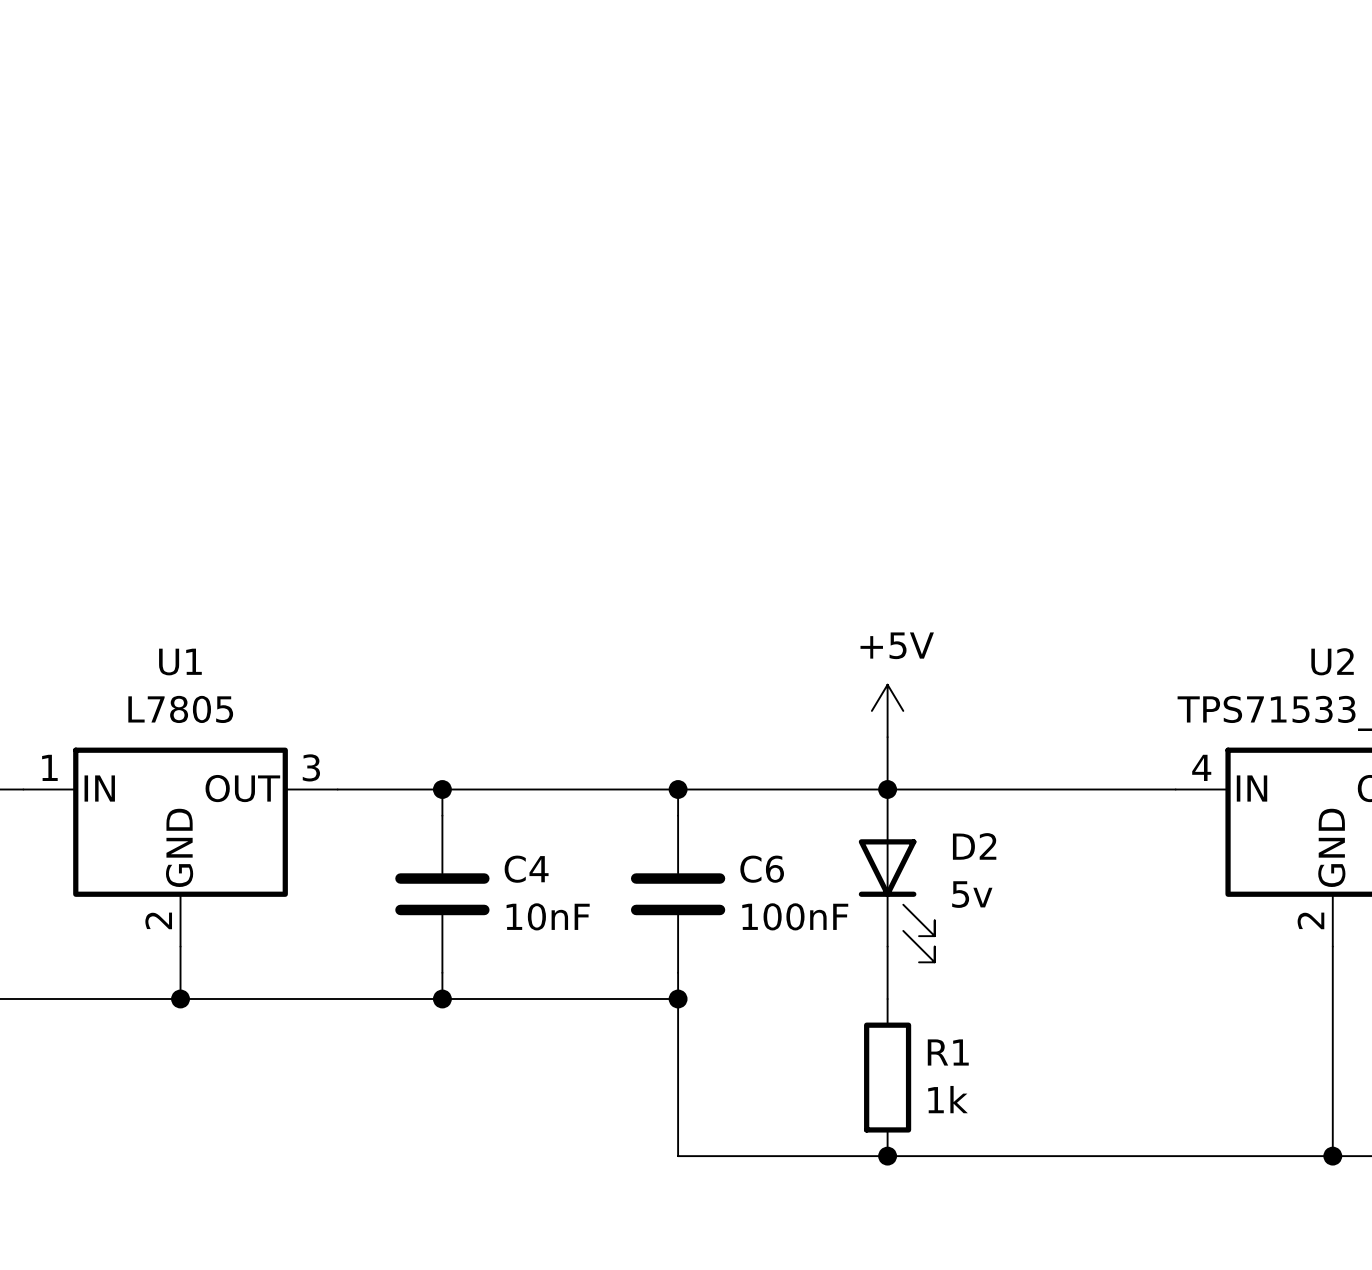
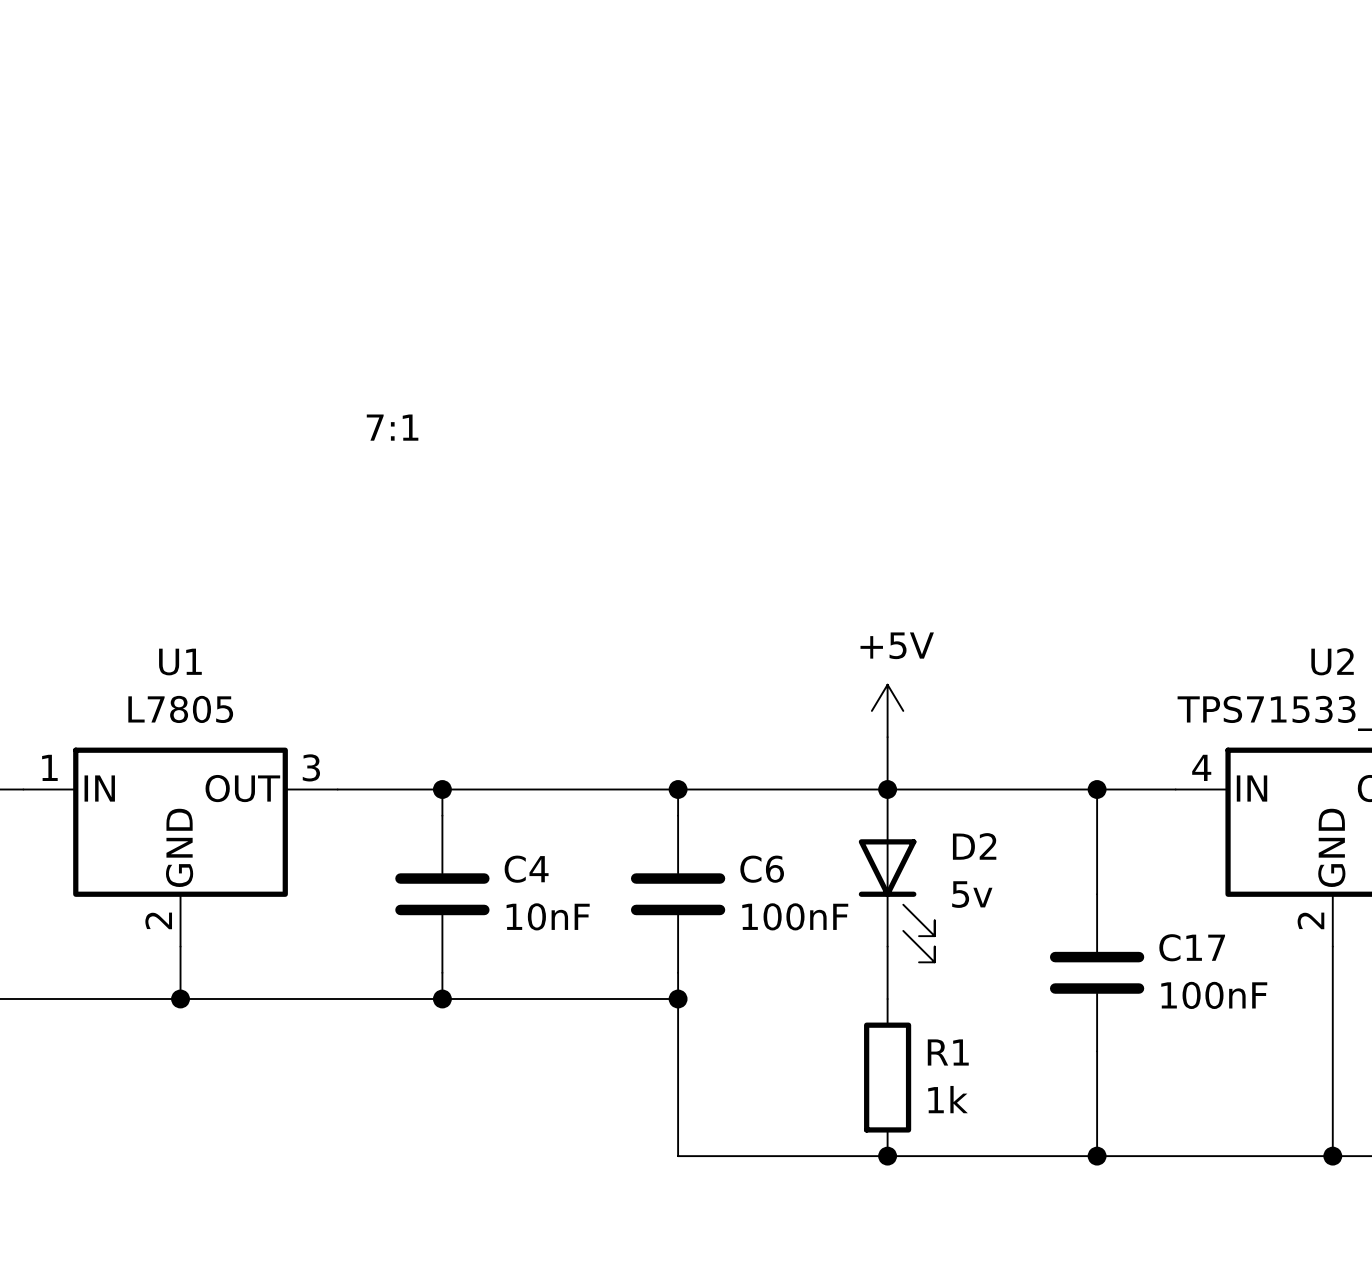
text: none -> 7:1 (392, 427)
wire: none -> (1097, 789) (1097, 894)
junction: none -> (1097, 789)
C17: none -> 100nF (1097, 972)
wire: none -> (1097, 1051) (1097, 1156)
junction: none -> (1097, 1156)

